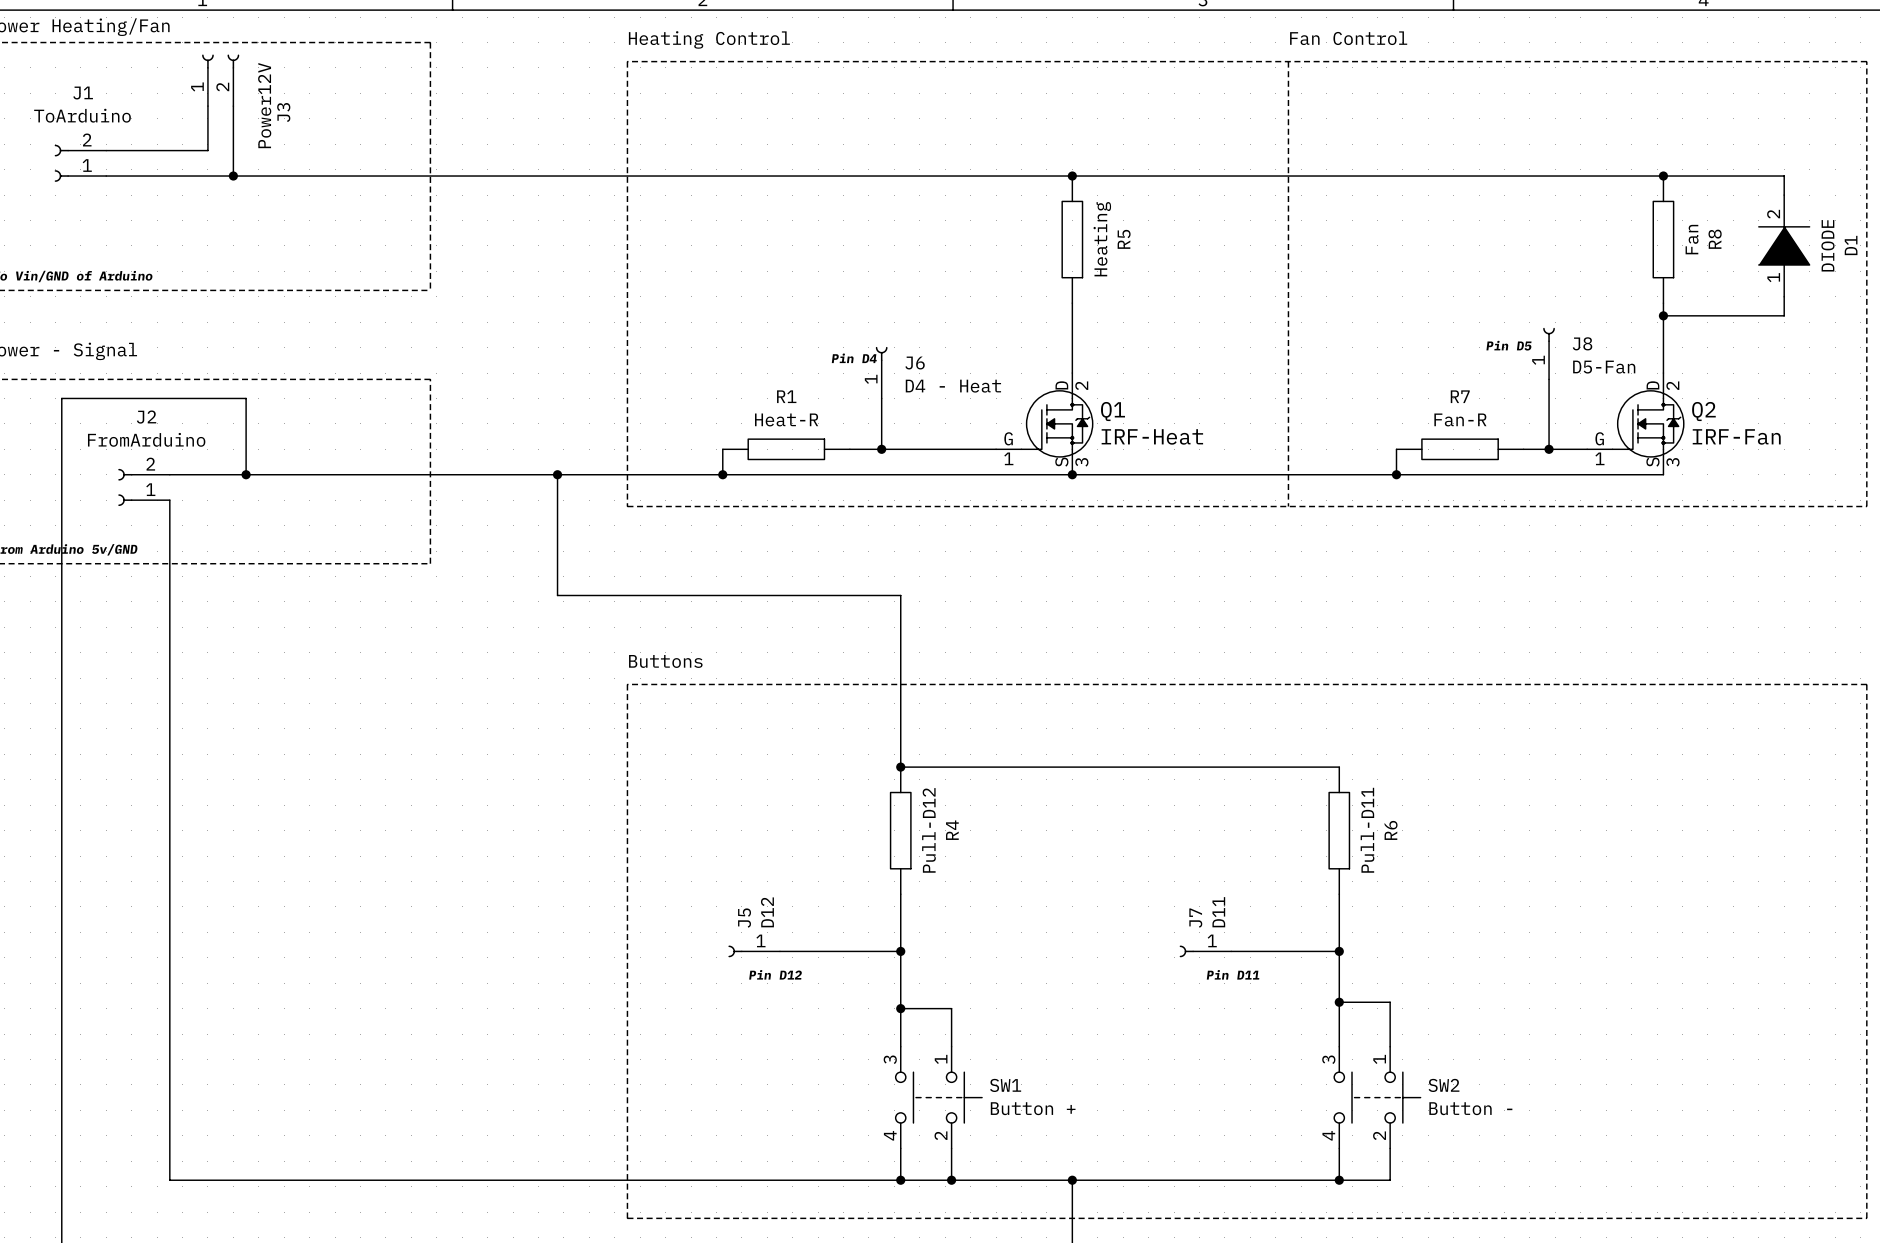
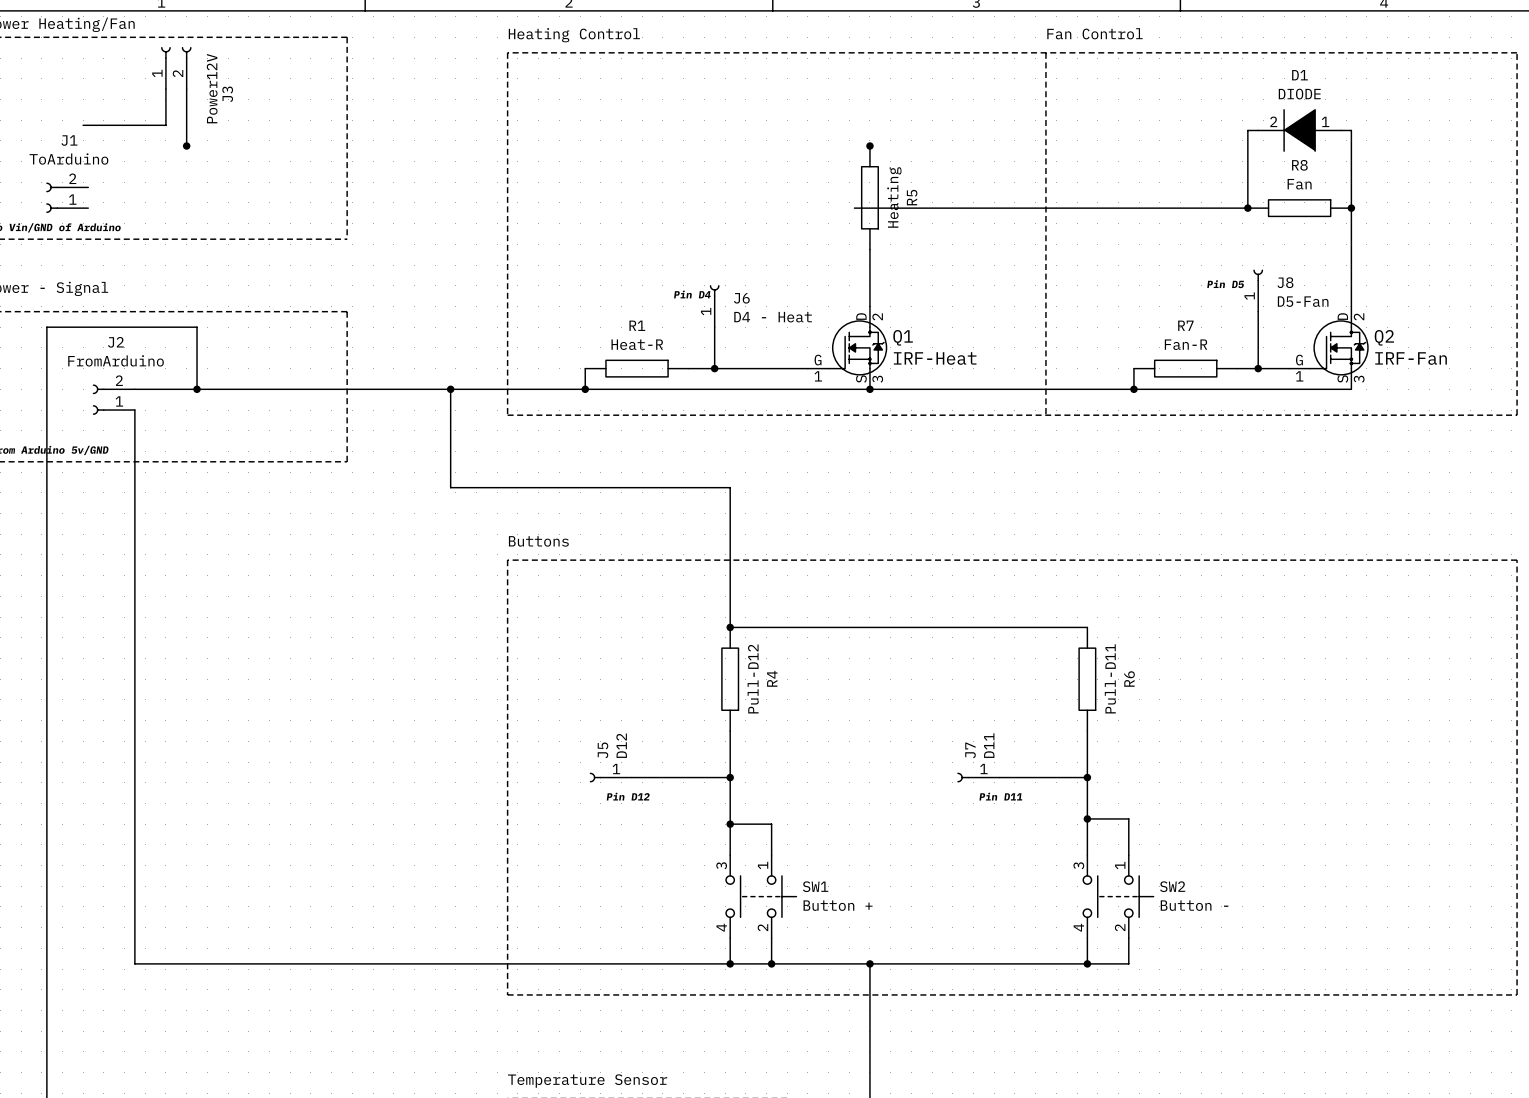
wire: none -> (1258, 130) (1247, 130) (1247, 208) (854, 208)
wire: none -> (1341, 130) (1351, 130) (1351, 249)
J1 position: (80, 163) -> (67, 197)
wire: (106, 176) (1784, 176) (1784, 195) -> none
junction: (1663, 176) -> none
R8 rotation: 0° (1663, 239) -> 90° clockwise (1299, 208)
R8 value position: Fan (1692, 239) -> Fan (1299, 184)
R8 name position: R8 (1715, 239) -> R8 (1299, 165)
D1 rotation: 0° (1784, 245) -> 90° counterclockwise (1299, 130)
D1 position: (1784, 245) -> (1299, 130)
junction: none -> (1247, 208)
junction: none -> (1351, 208)
wire: (1784, 296) (1784, 315) (1663, 315) -> none
junction: (1663, 315) -> none

